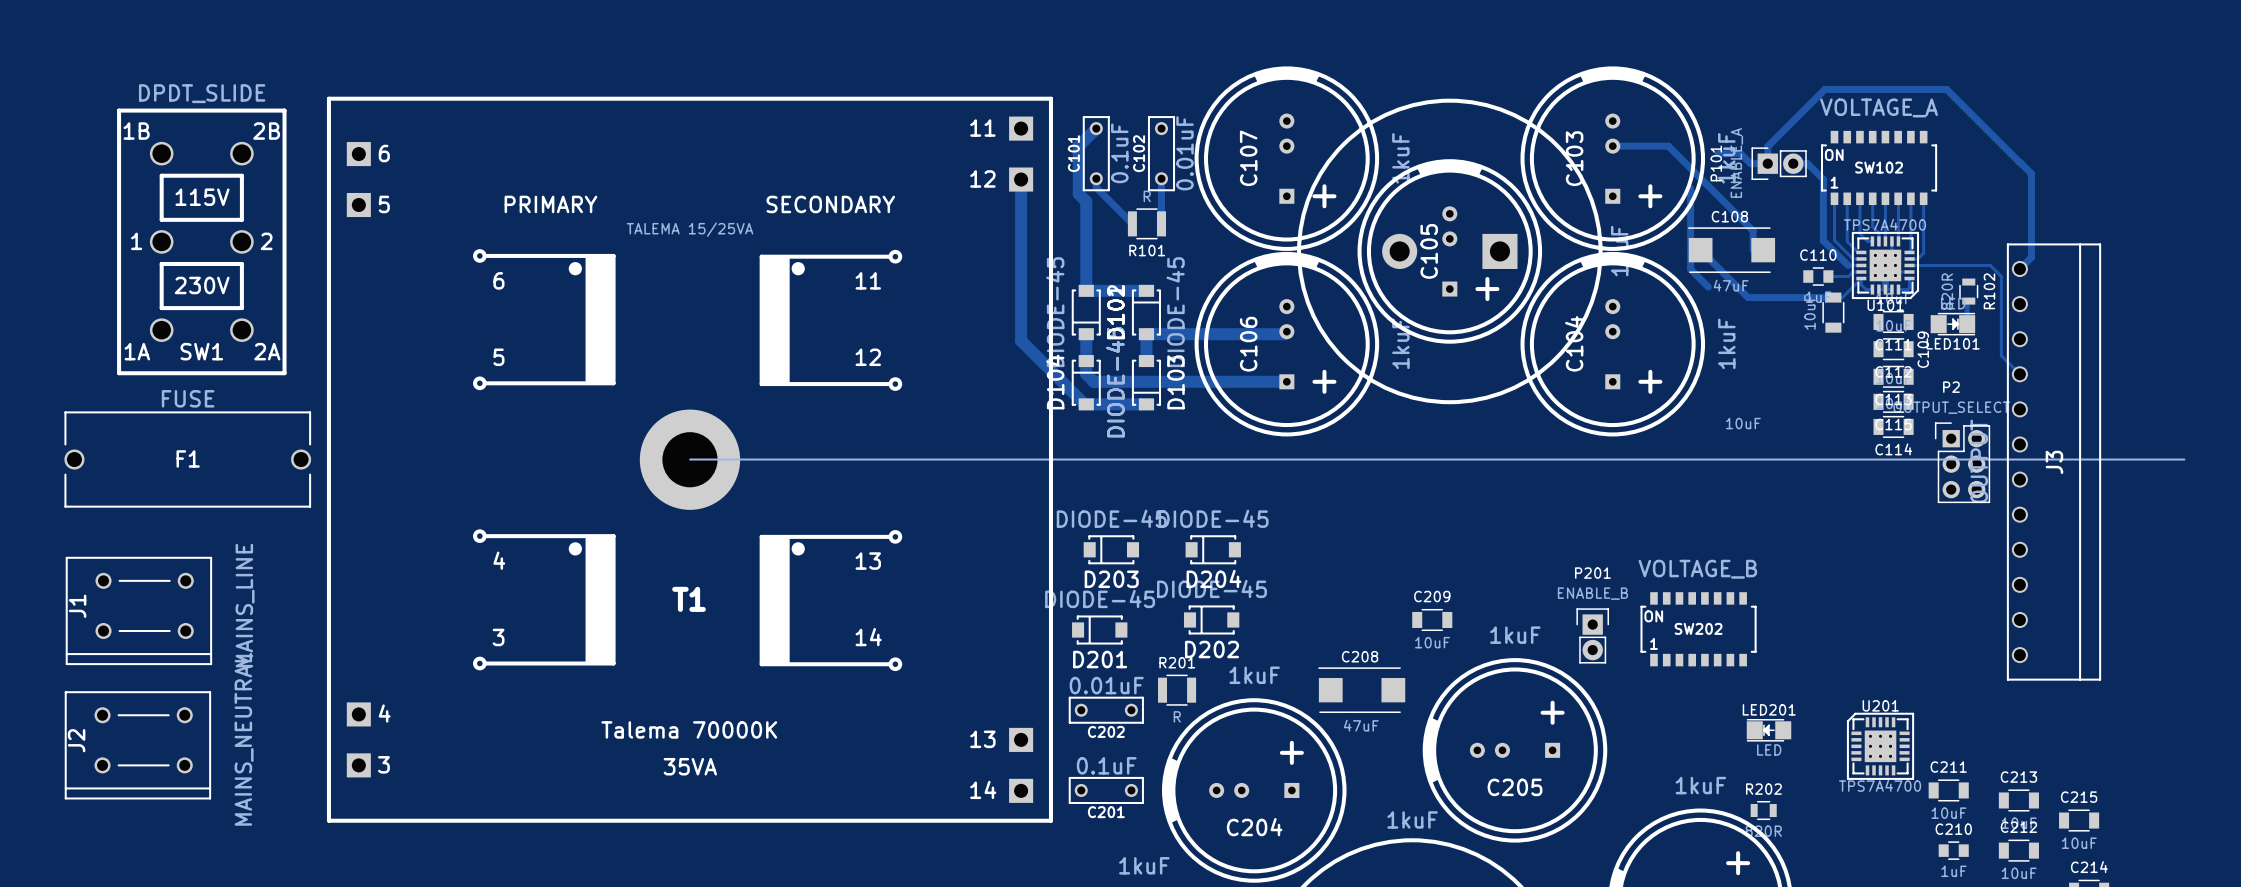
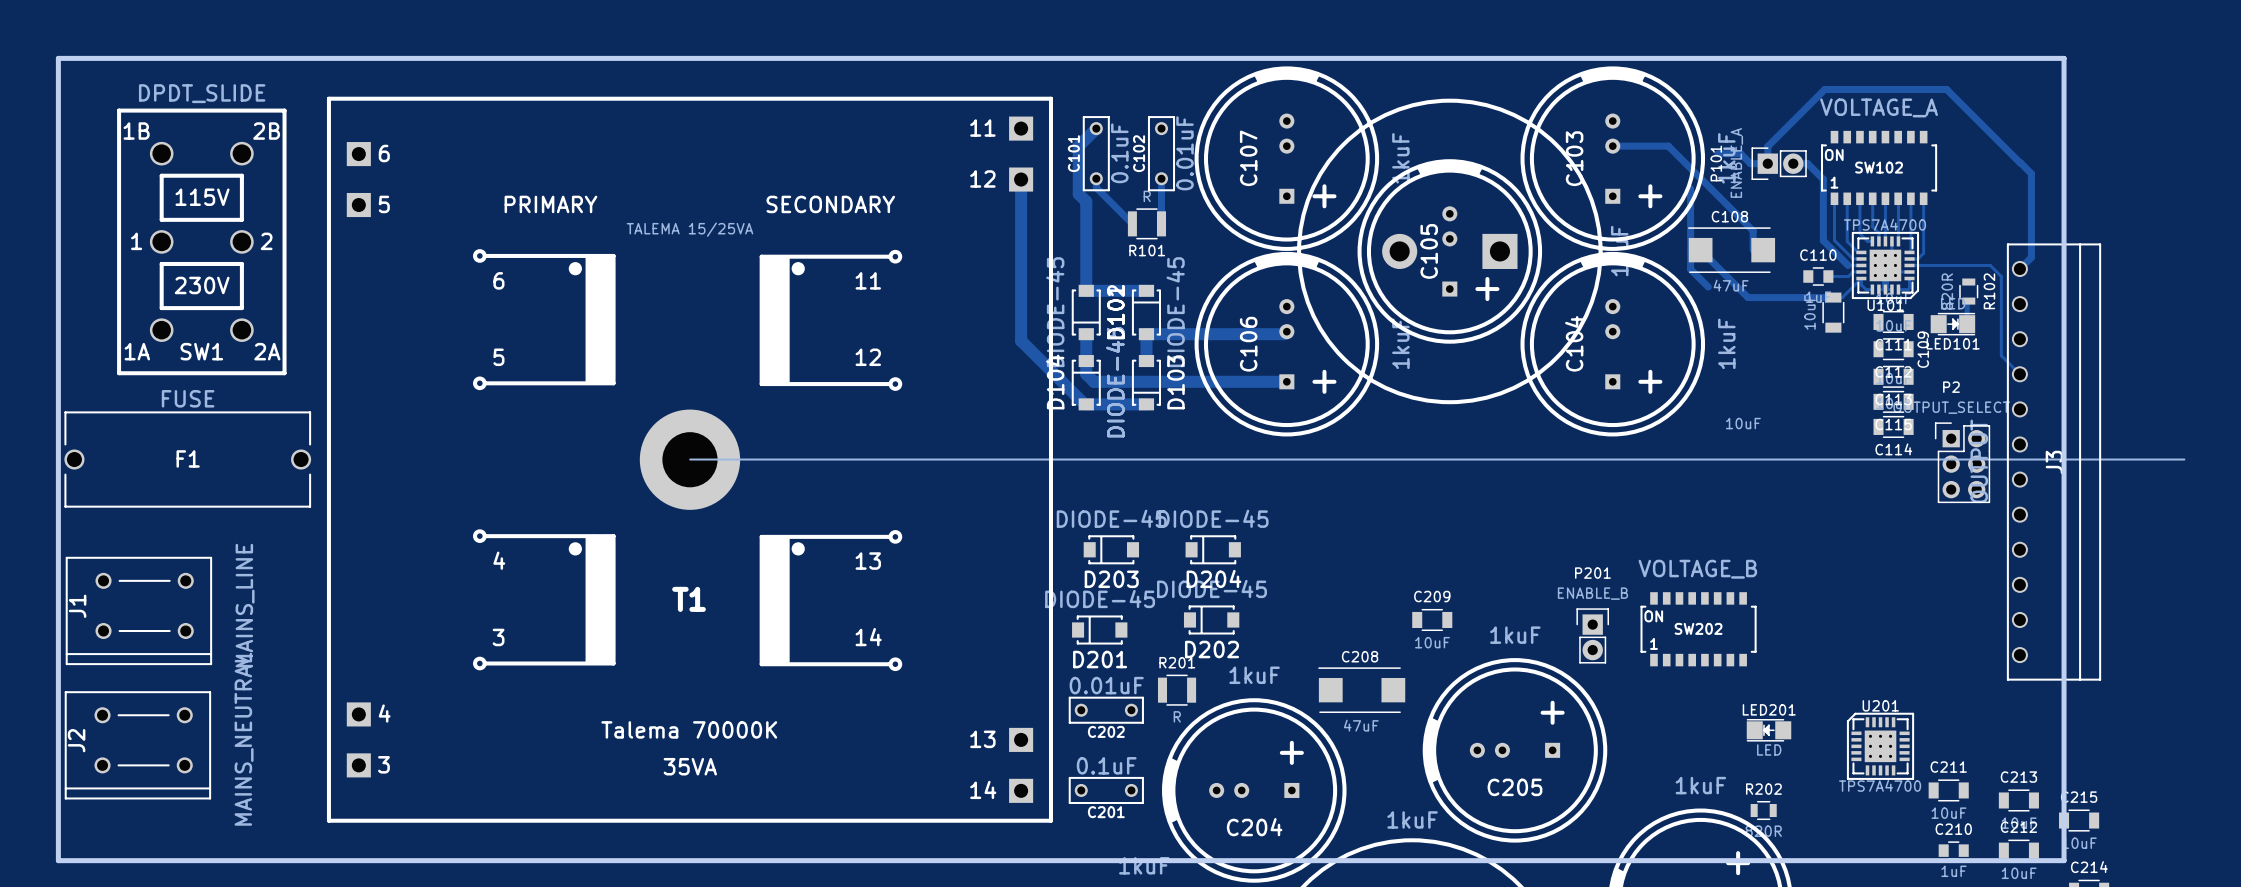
board edge: none -> (58, 58) (2064, 58) (2064, 860) (58, 860) (58, 58)

